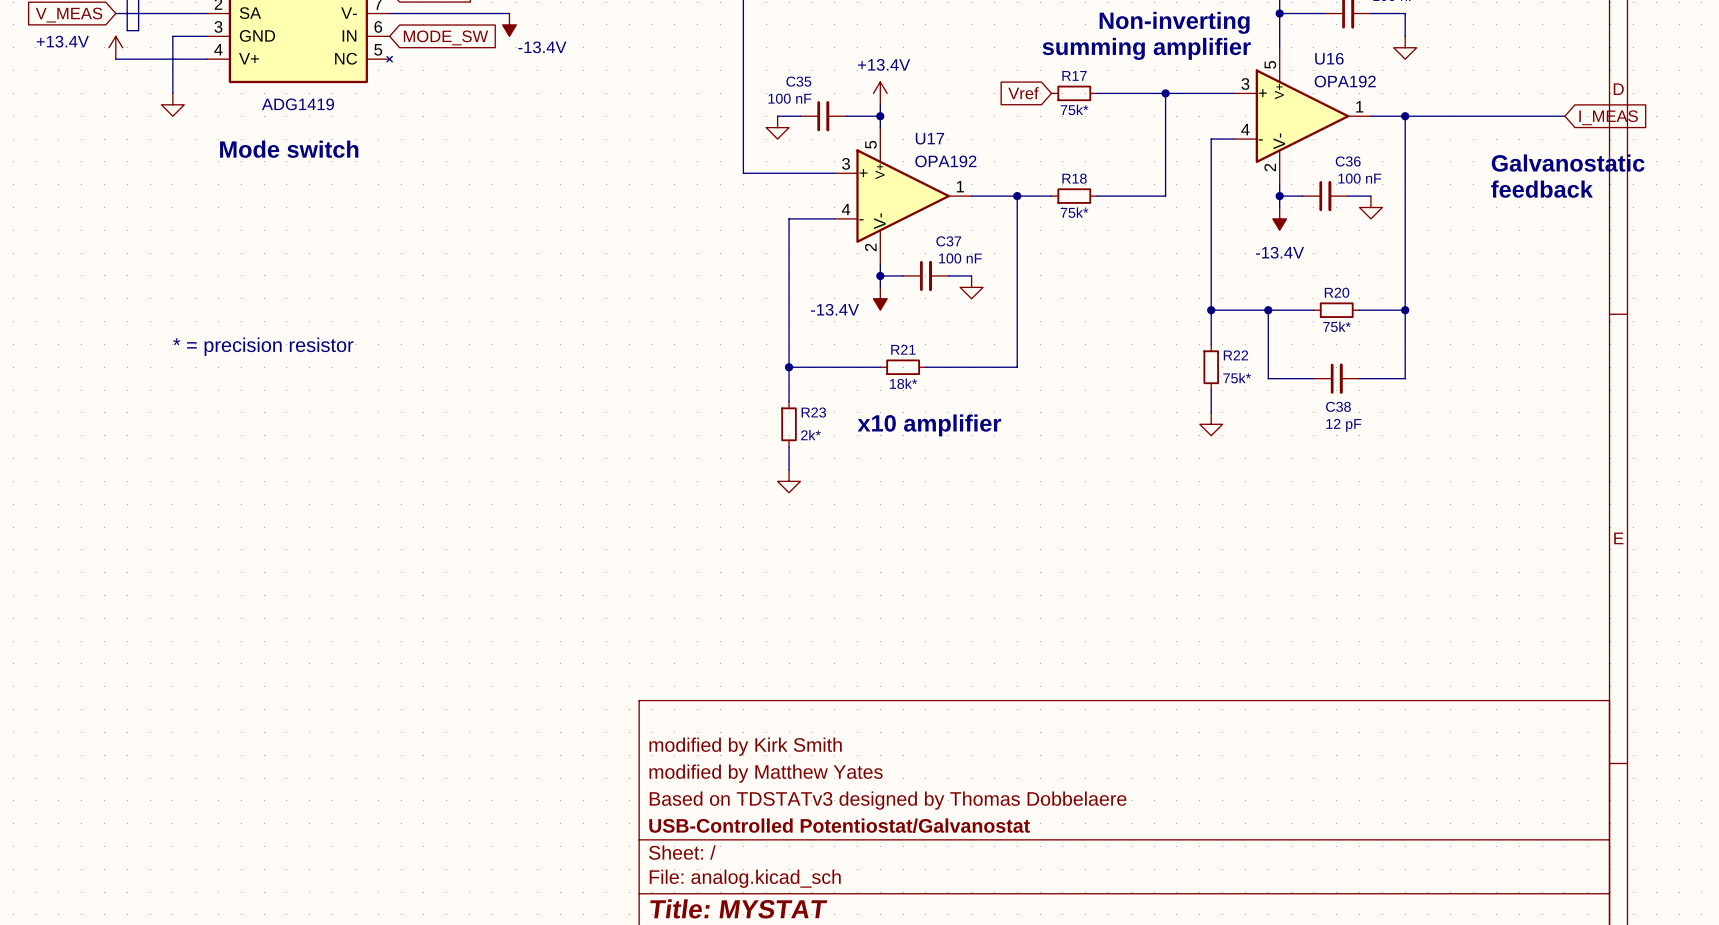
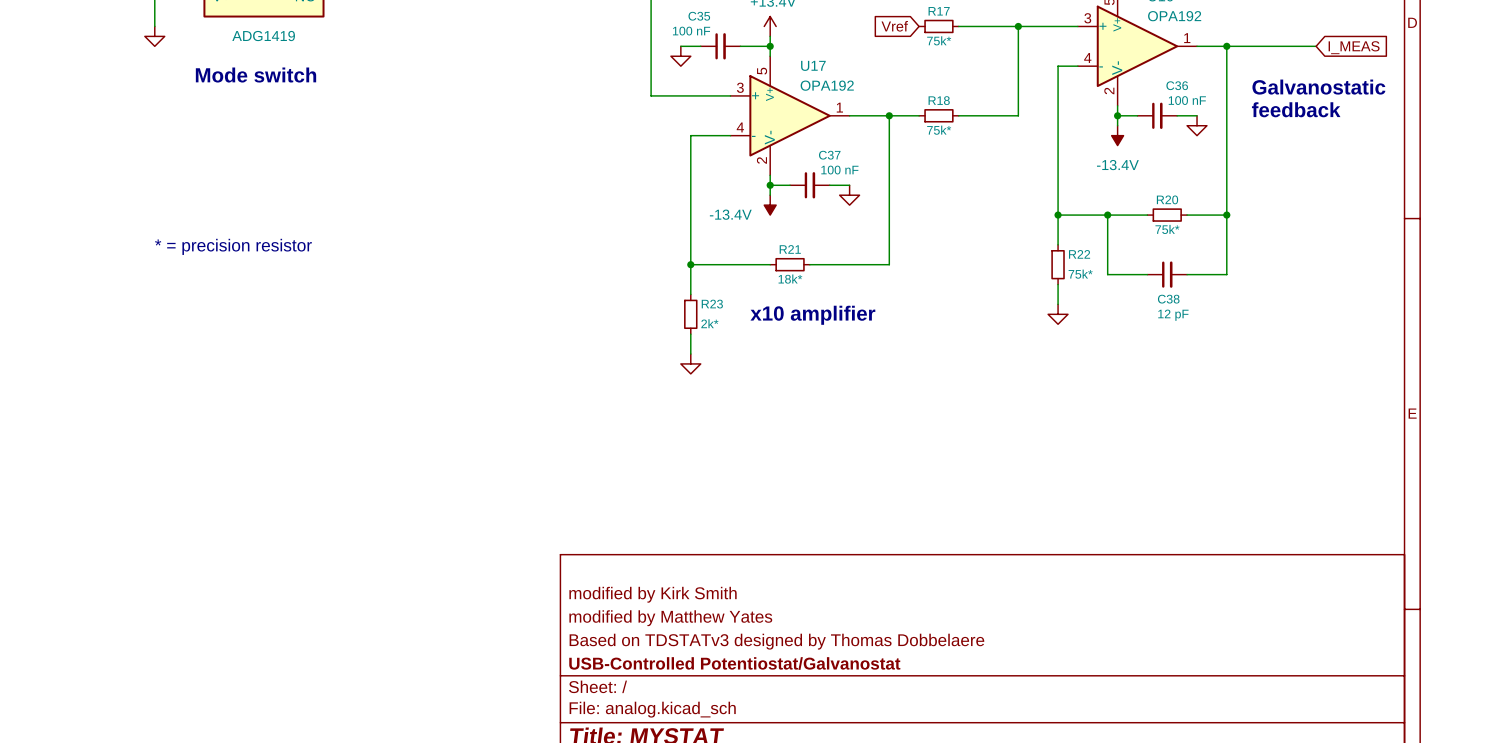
wire: (1507, 116) (1564, 116) -> none
global label position: I_MEAS (1608, 117) -> I_MEAS (1354, 47)
text position: Galvanostatic (1568, 163) -> Galvanostatic (1318, 87)
text position: feedback (1542, 189) -> feedback (1296, 109)

